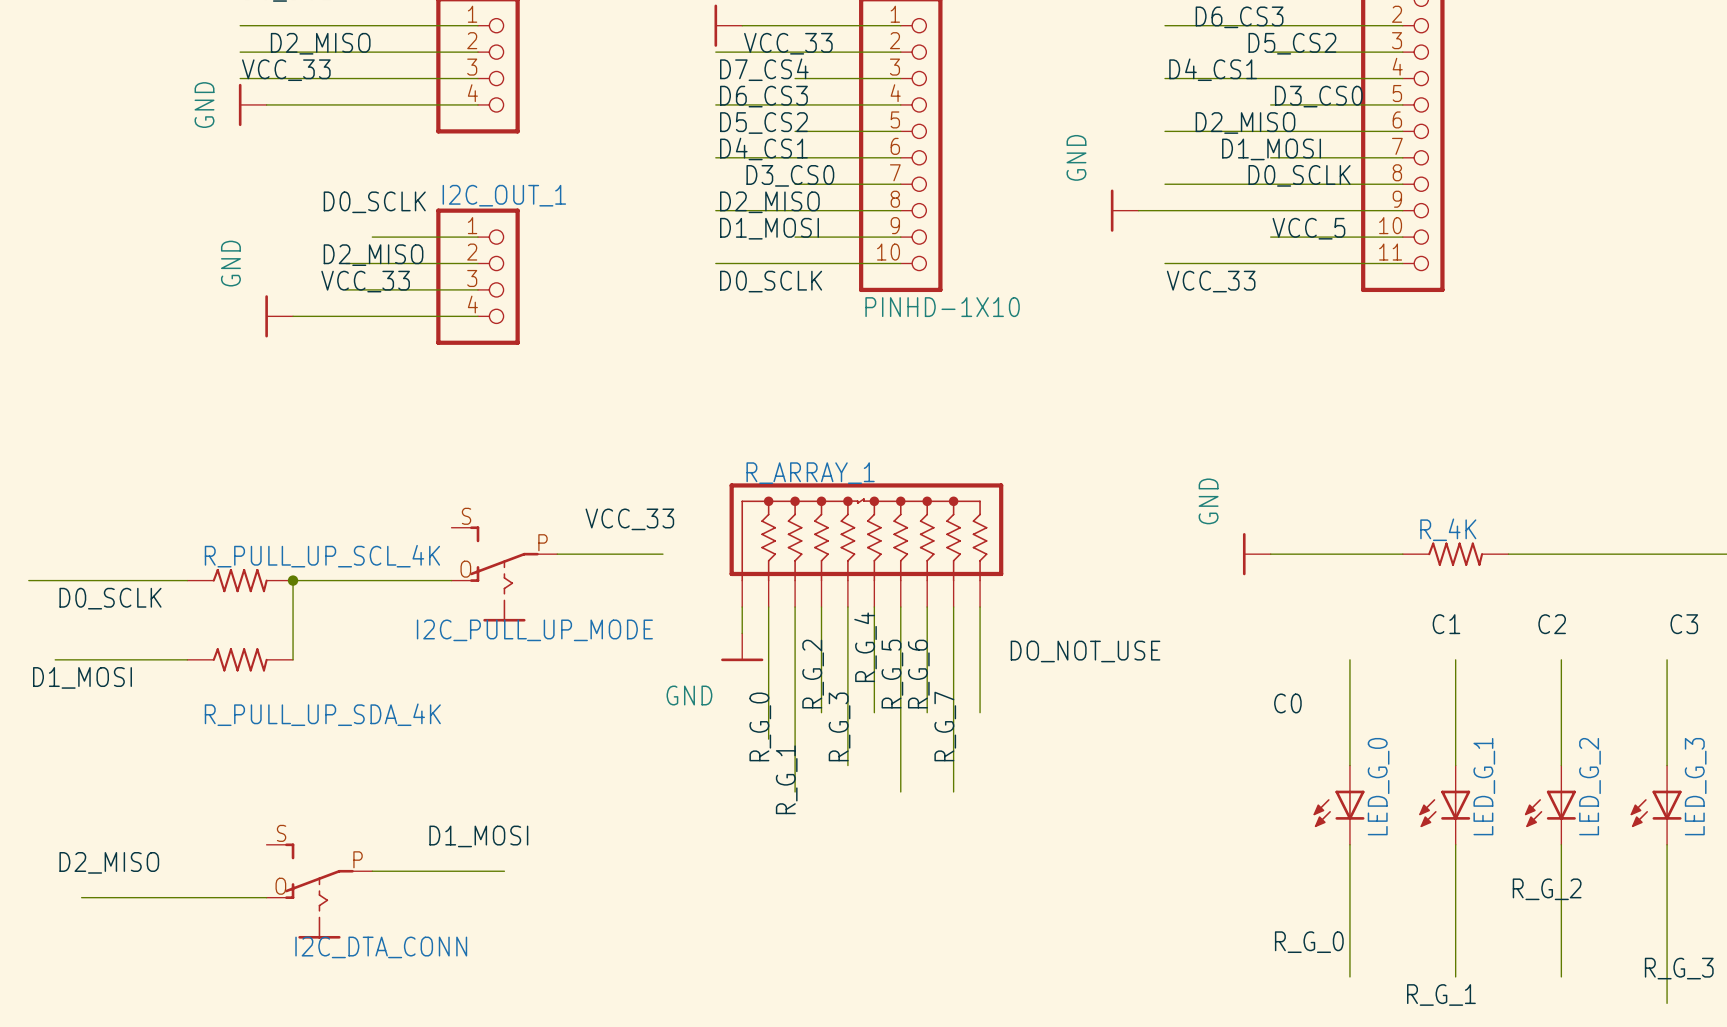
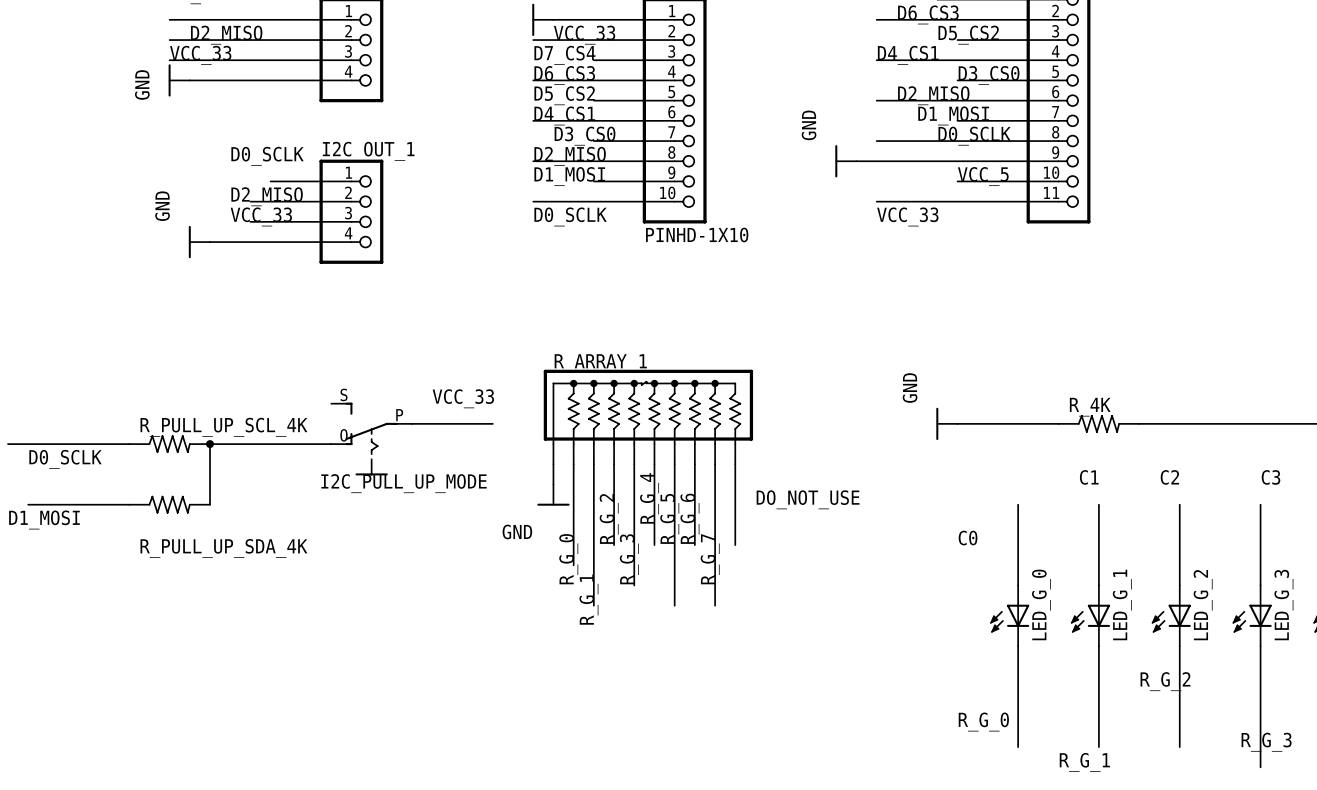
label: D1_MOSI (478, 836) -> none
label: D2_MISO (109, 862) -> none
wire: (372, 871) (504, 871) -> none
I2C_DTA_CONN: (319, 891) -> none
wire: (81, 897) (266, 897) -> none

